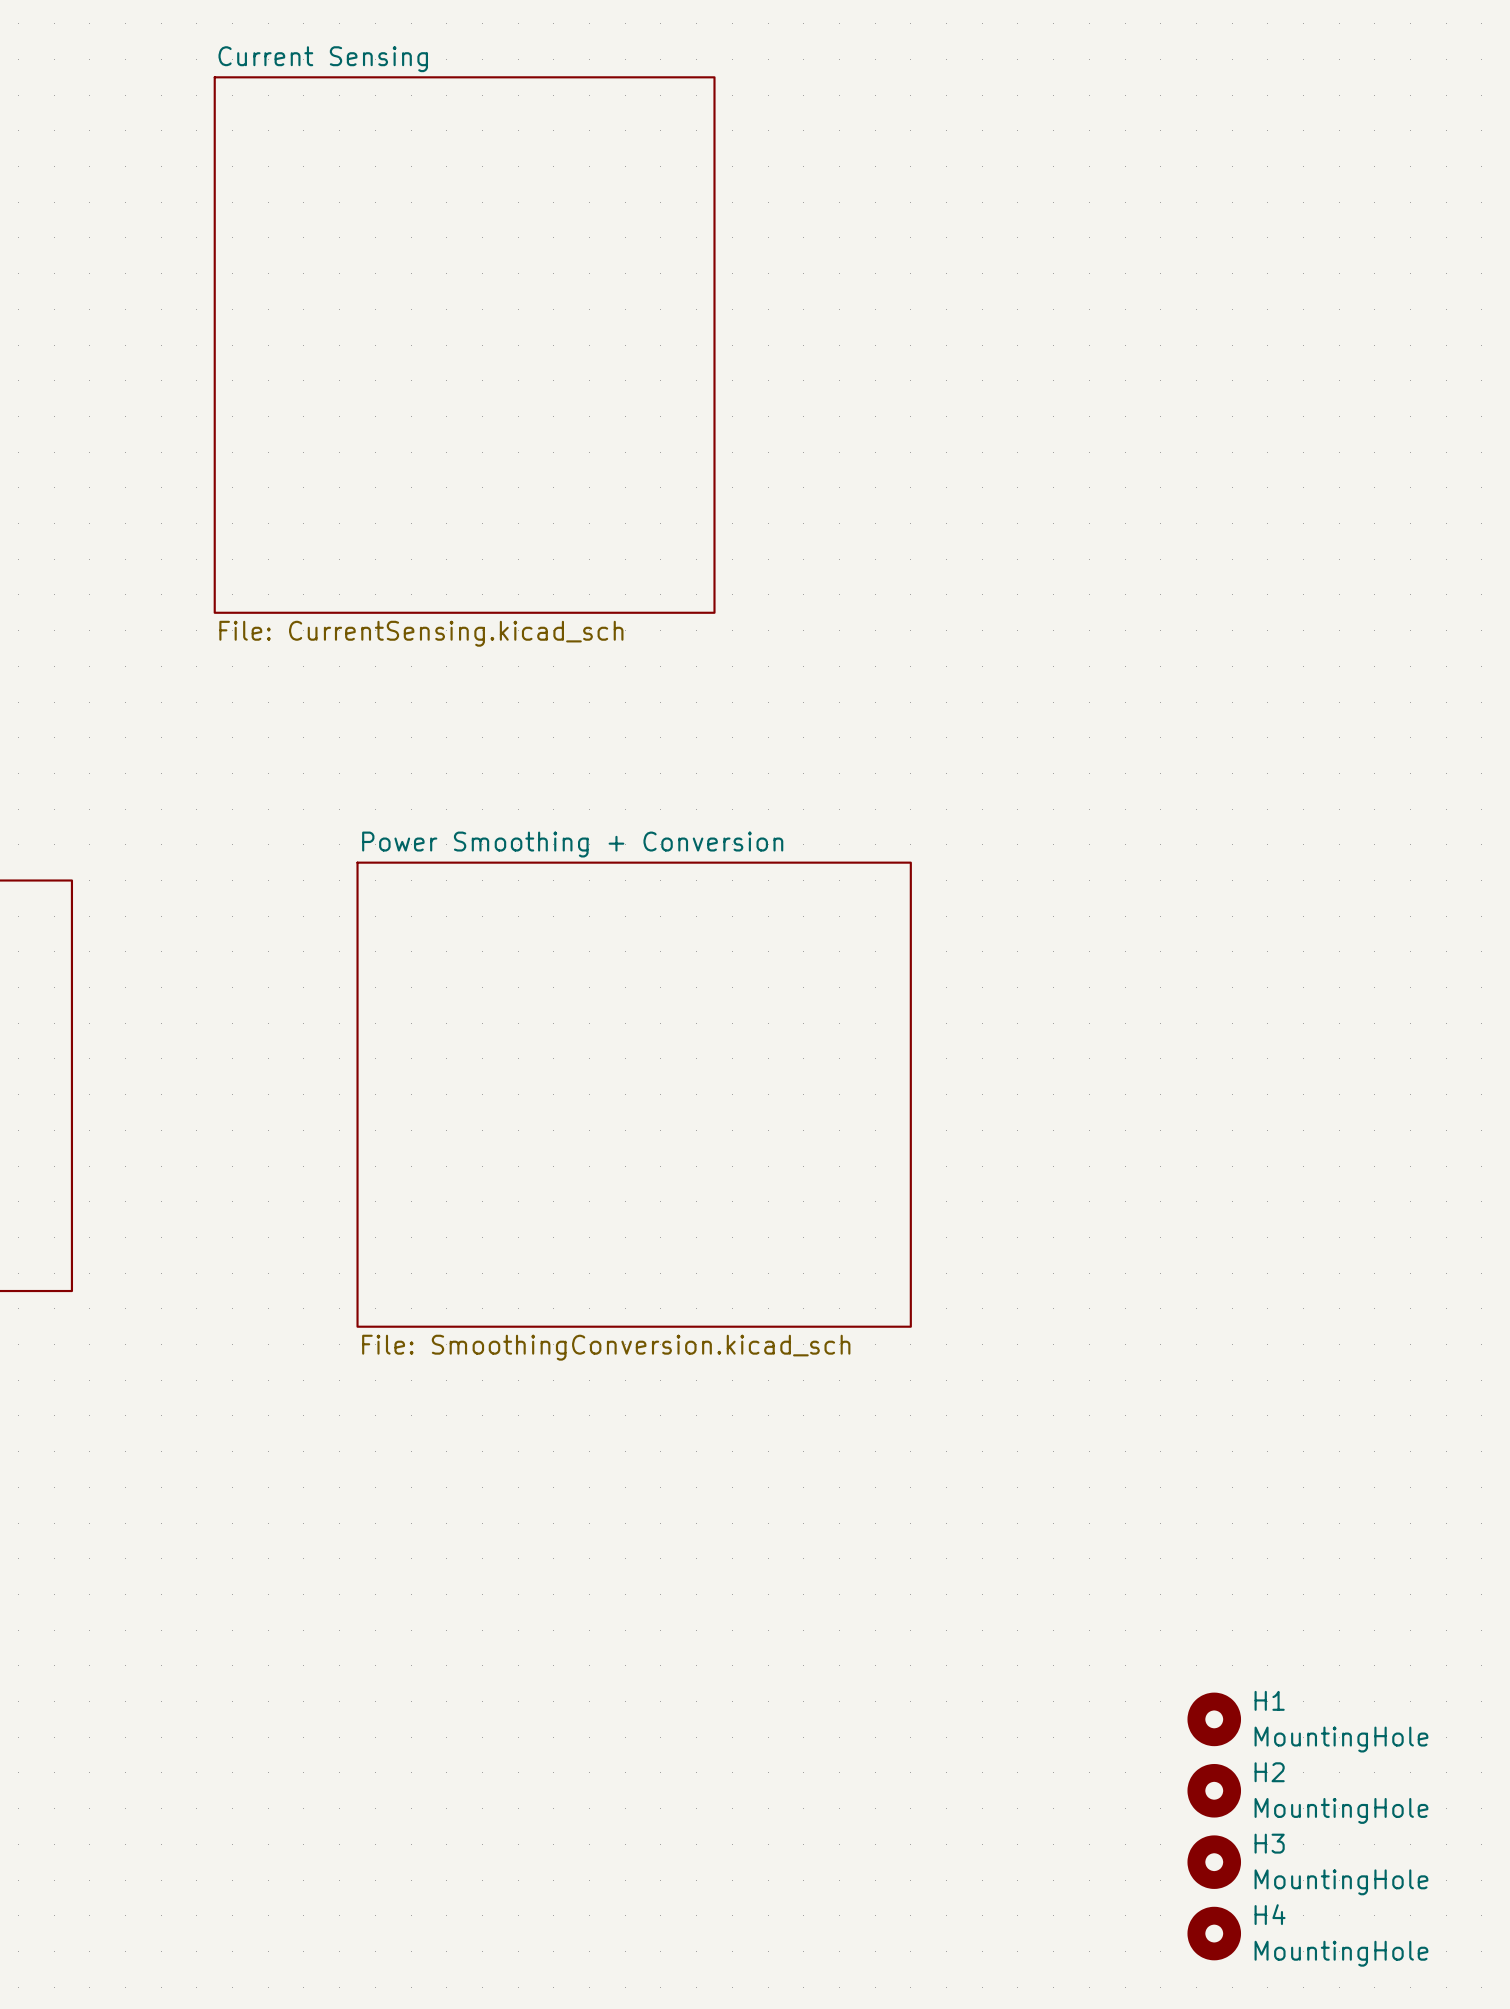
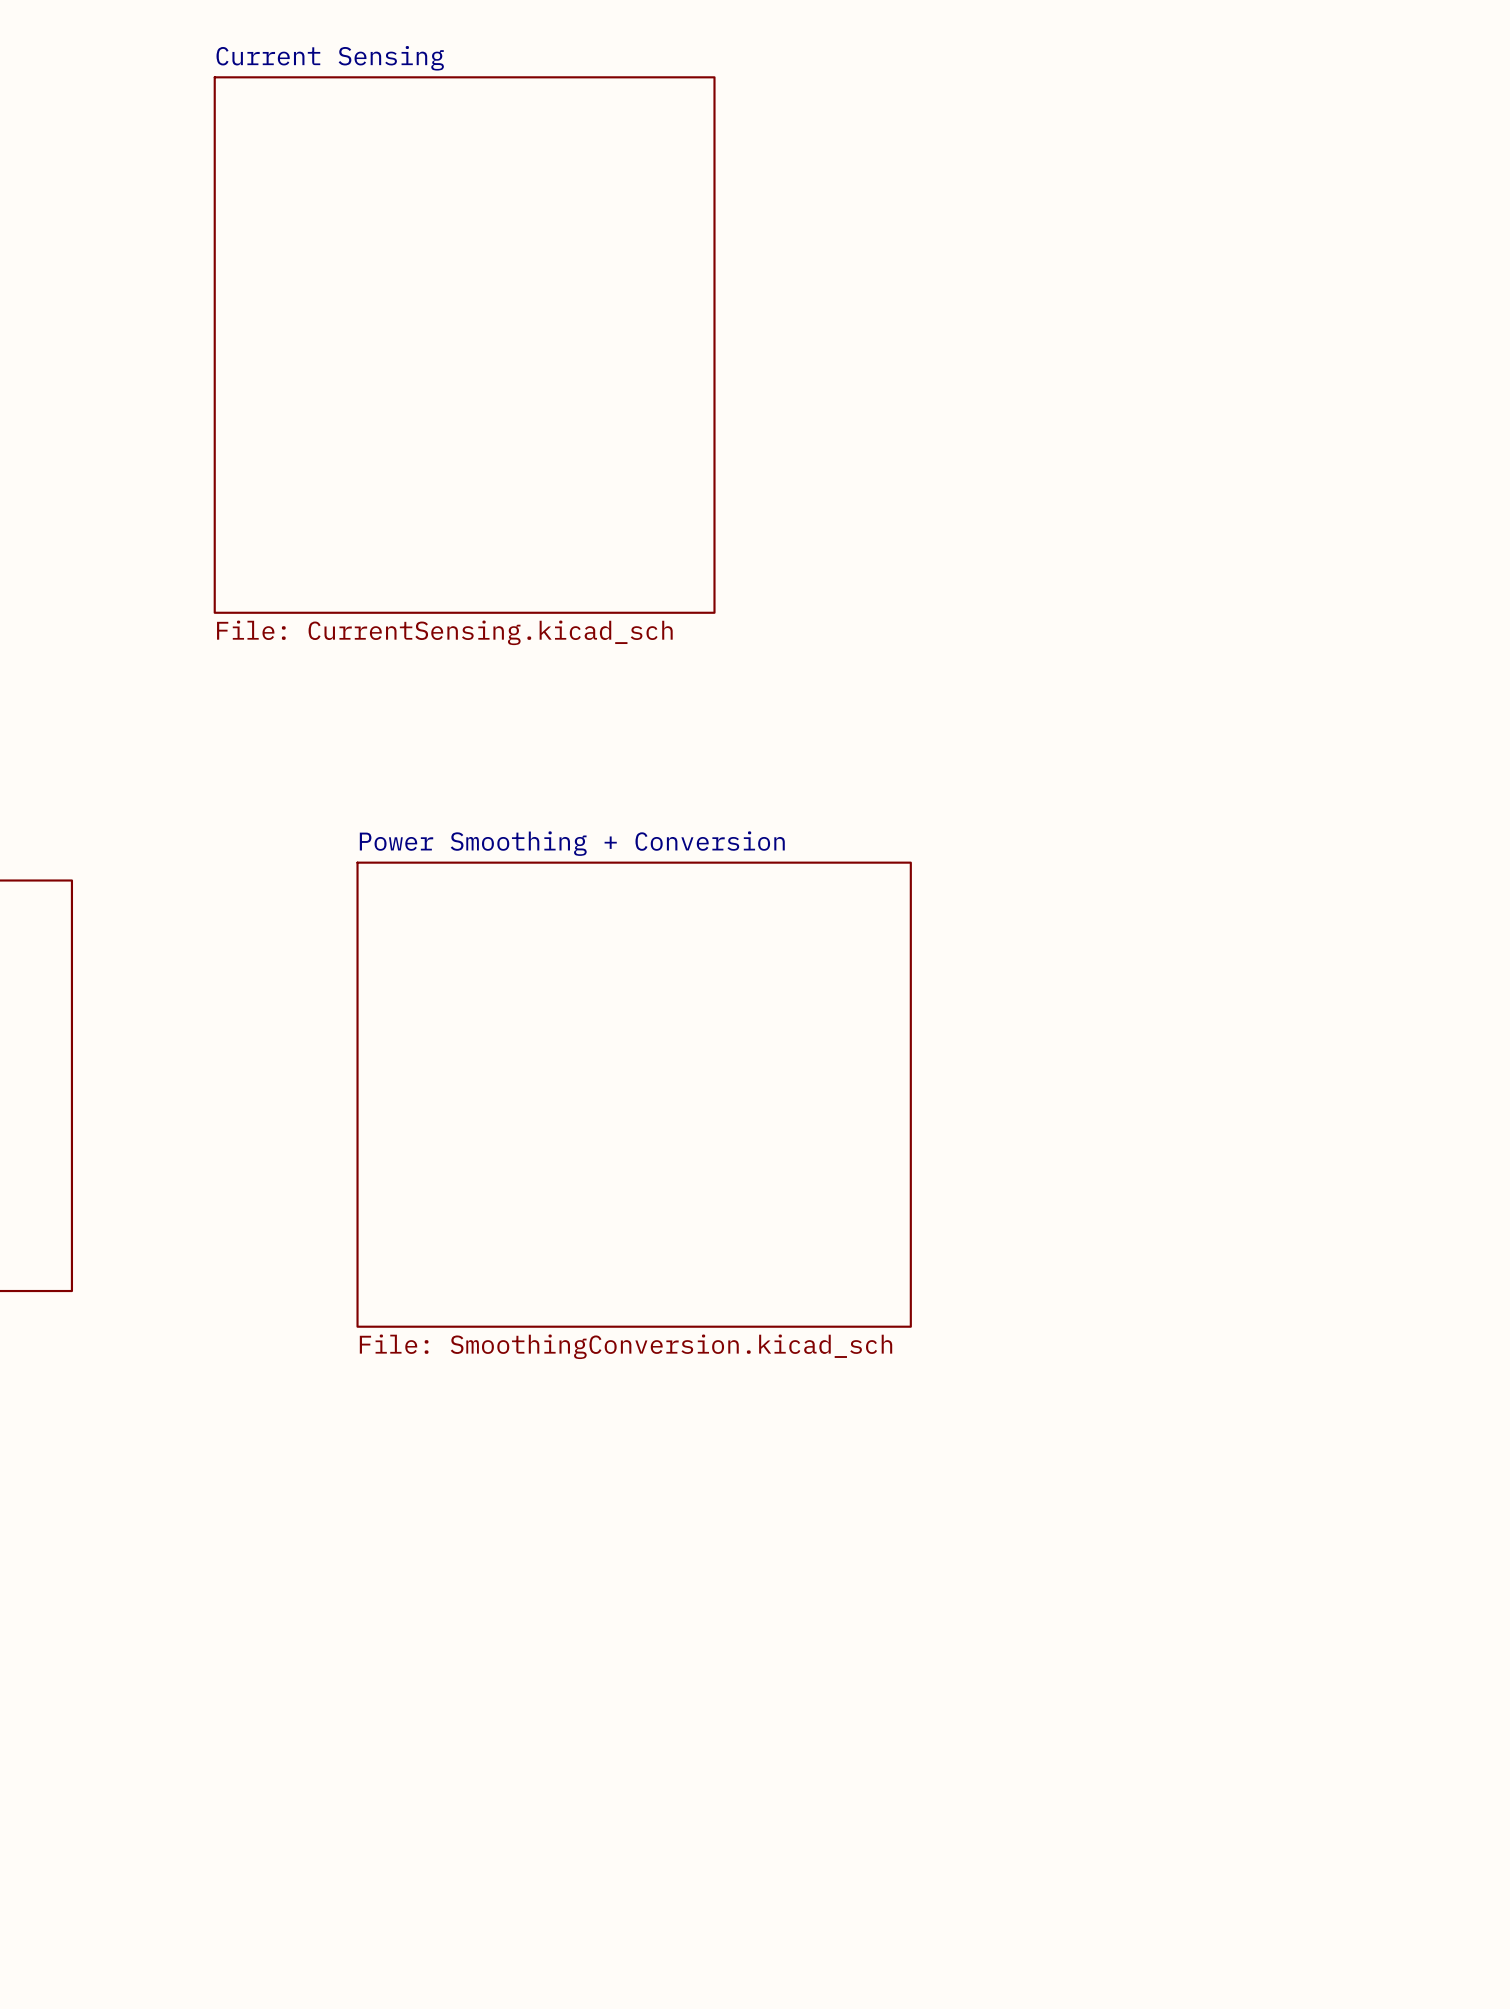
H1: MountingHole (1214, 1719) -> none
H2: MountingHole (1214, 1790) -> none
H3: MountingHole (1214, 1862) -> none
H4: MountingHole (1214, 1933) -> none

